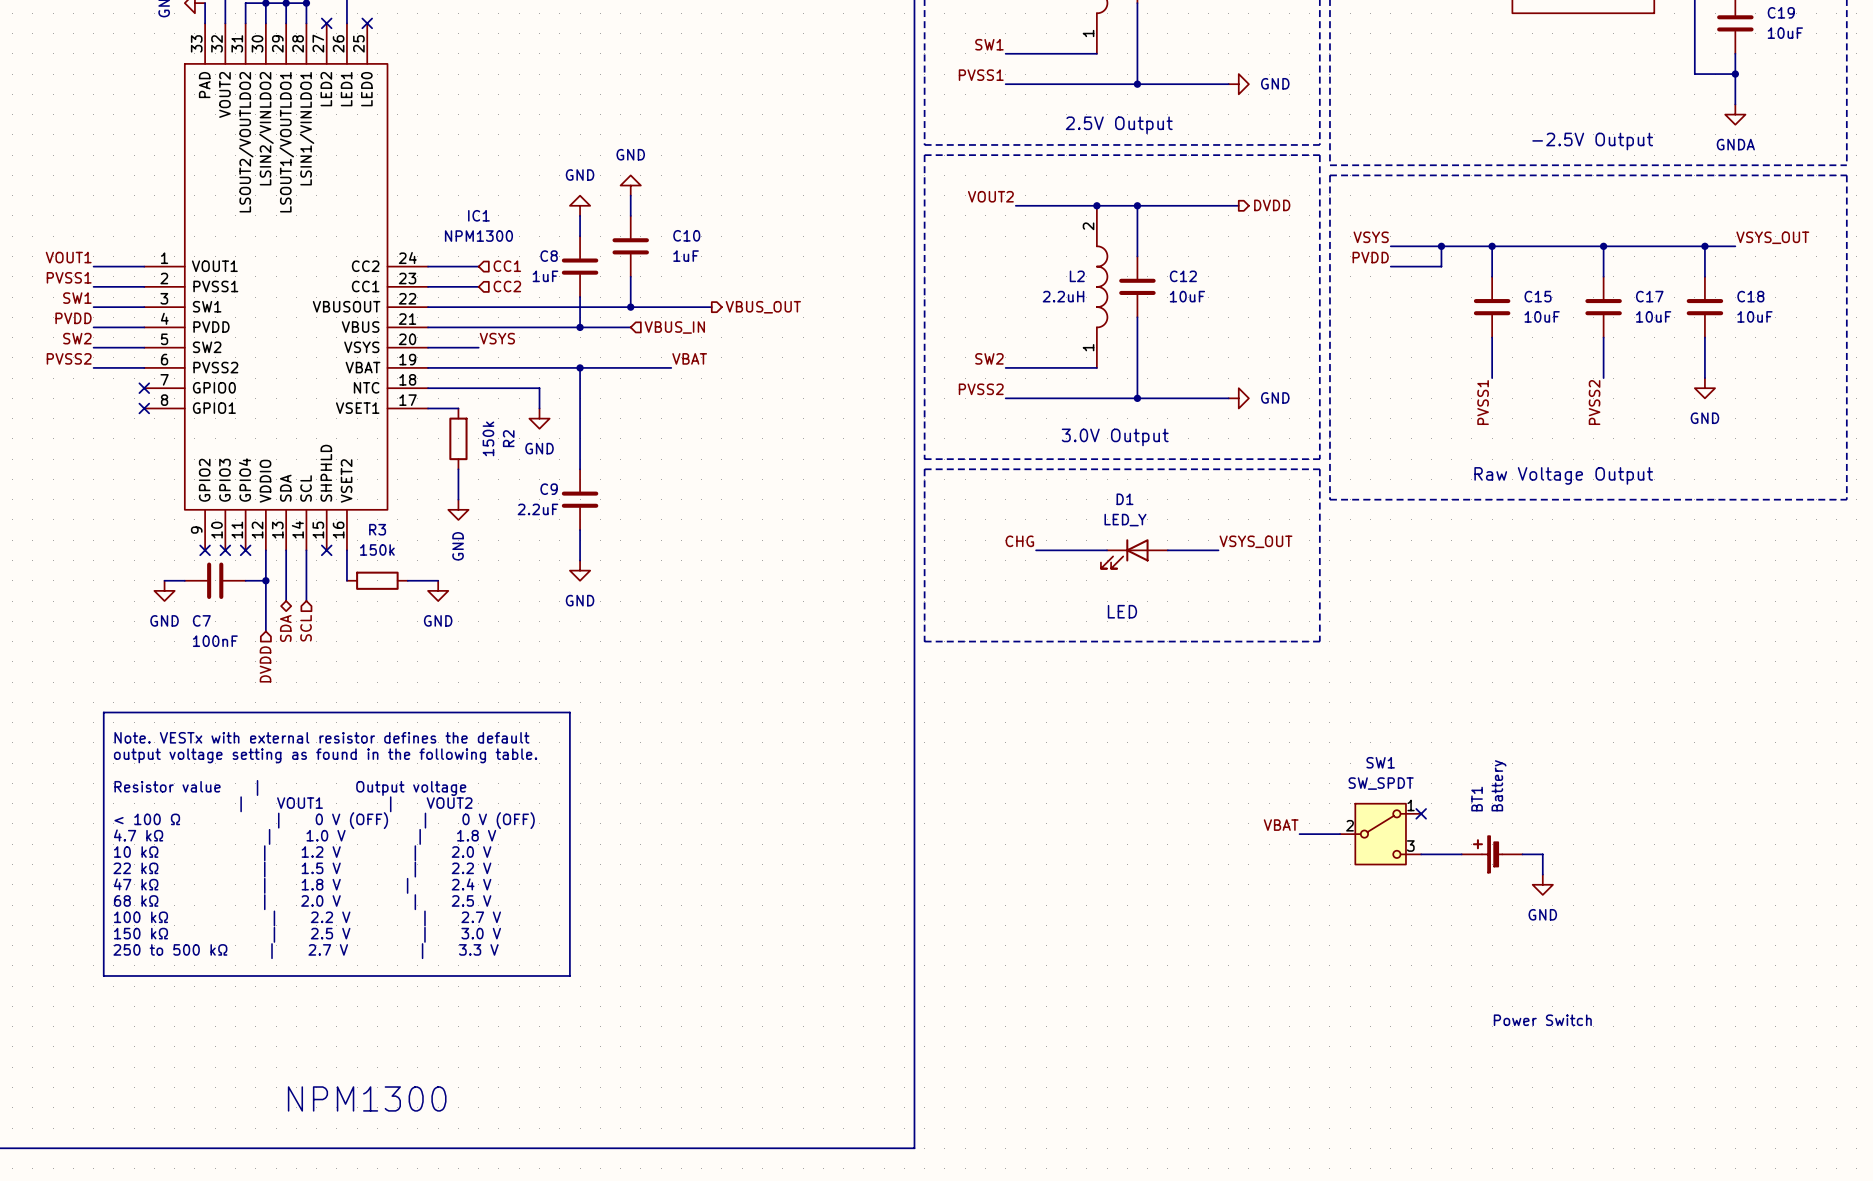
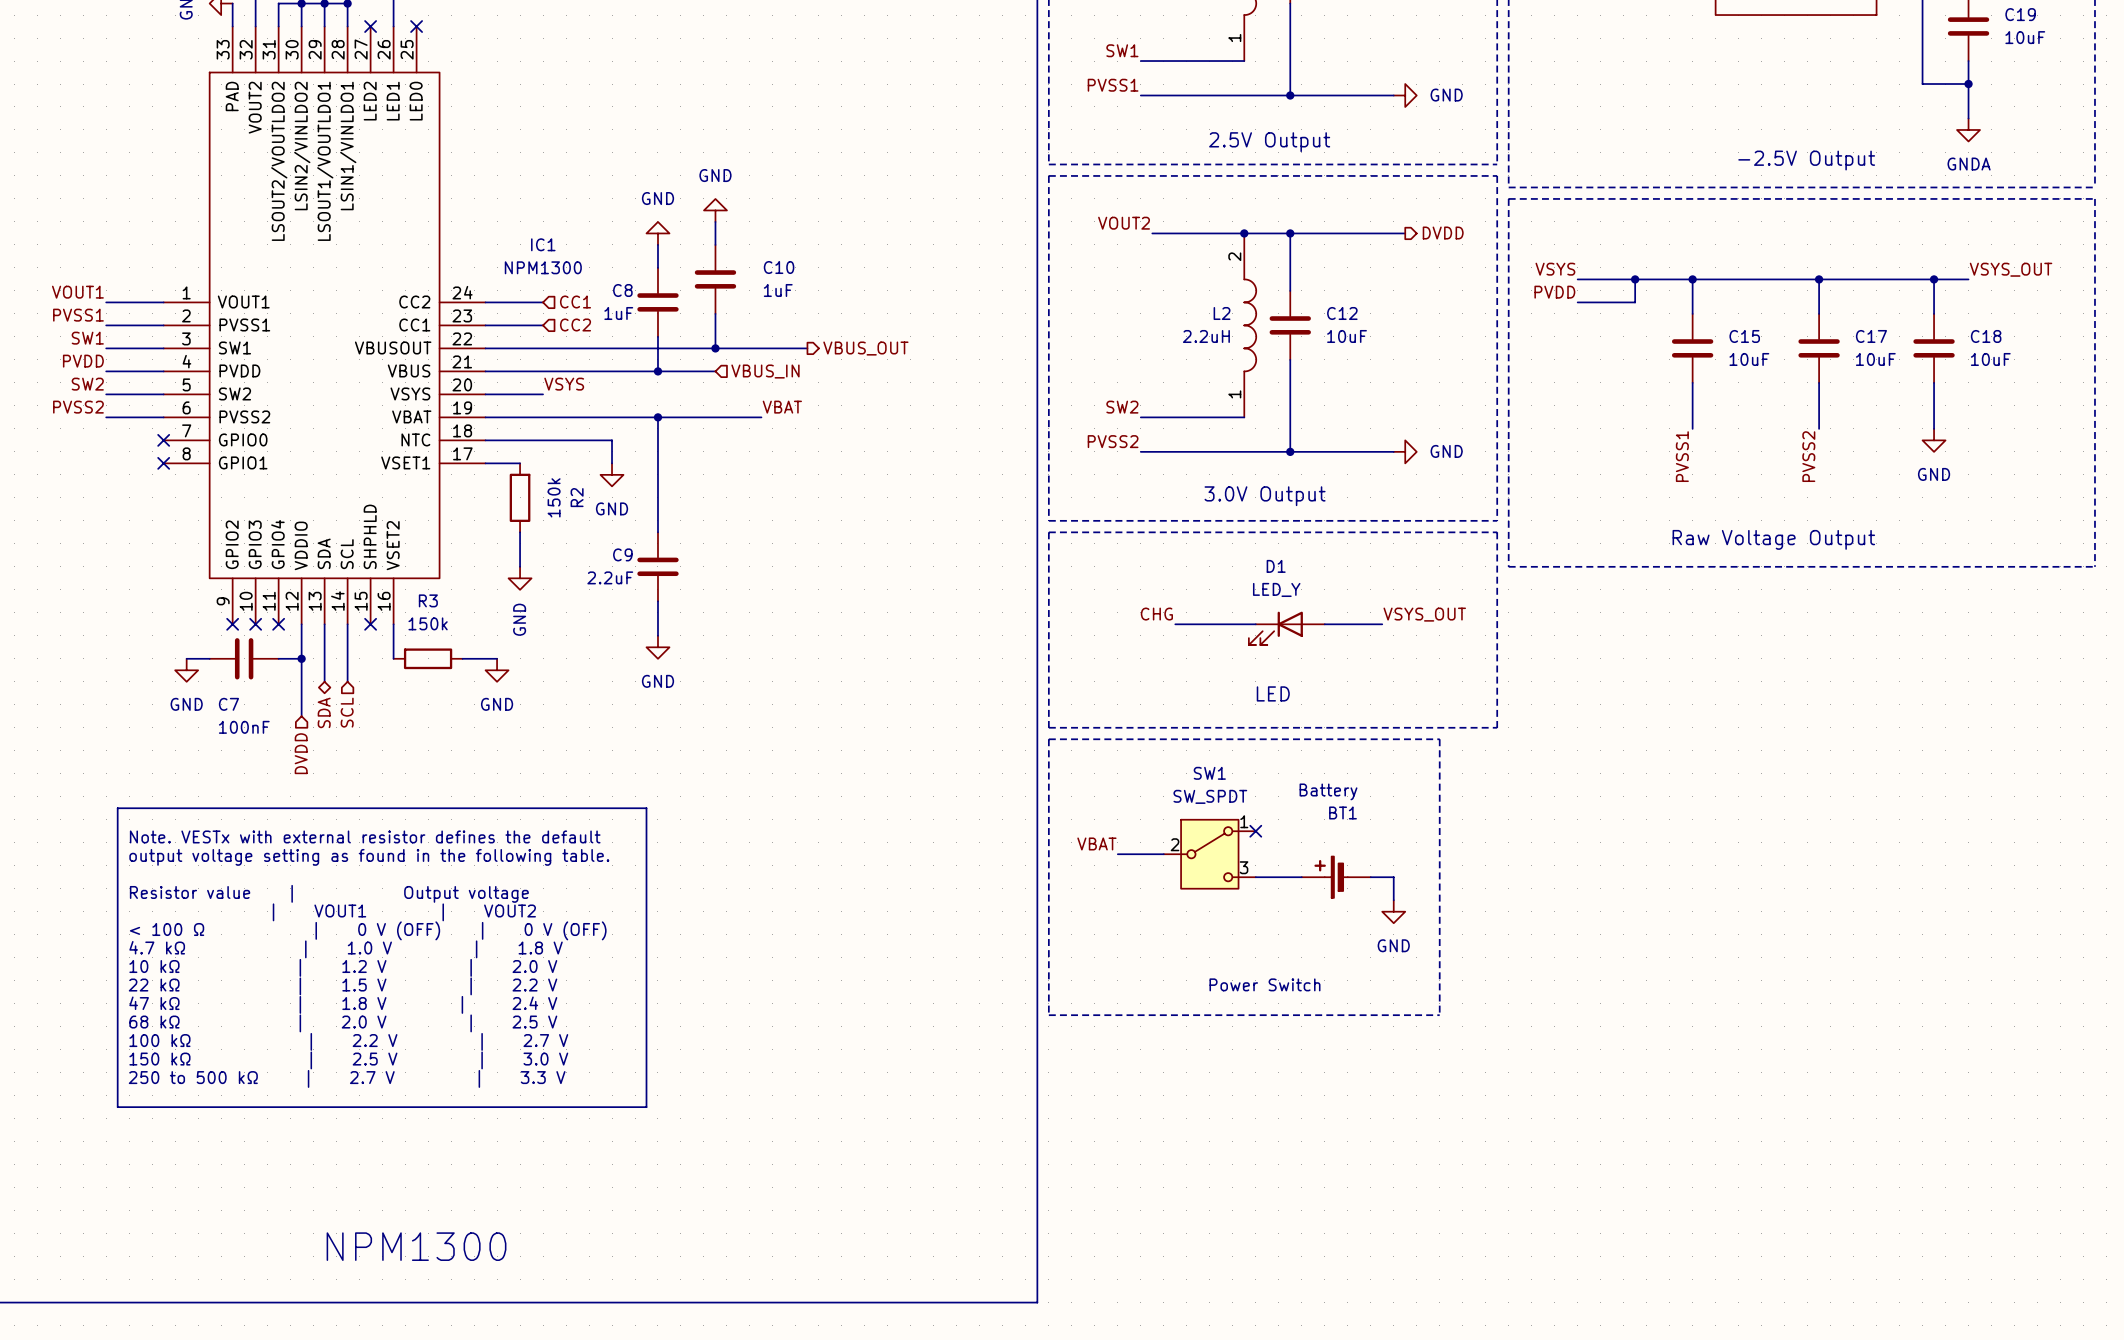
line: none -> (1048, 739) (1048, 1015) (1439, 1015) (1439, 739) (1048, 739)
no-connect mark: none -> (1255, 831)
label: none -> VBAT (1096, 843)
wire: none -> (1117, 854) (1163, 854)
wire: none -> (1255, 877) (1301, 877)
wire: none -> (1370, 877) (1393, 877) (1393, 900)
BT1 value rotation: 0° (1499, 785) -> 90° clockwise (1328, 791)
BT1 name rotation: 0° (1477, 799) -> 90° clockwise (1343, 812)
power symbol: none -> GND (1393, 911)
no-connect mark: (1421, 813) -> none
label: VBAT (1281, 825) -> none
wire: (1299, 834) (1340, 834) -> none
SW1 position: (1380, 834) -> (1209, 854)
wire: (1421, 854) (1461, 854) -> none
BT1 position: (1492, 854) -> (1336, 877)
wire: (1522, 854) (1542, 854) (1542, 874) -> none
text: none -> Power Switch (1264, 984)
power symbol: GND (1542, 884) -> none
text: Power Switch (1542, 1020) -> none

